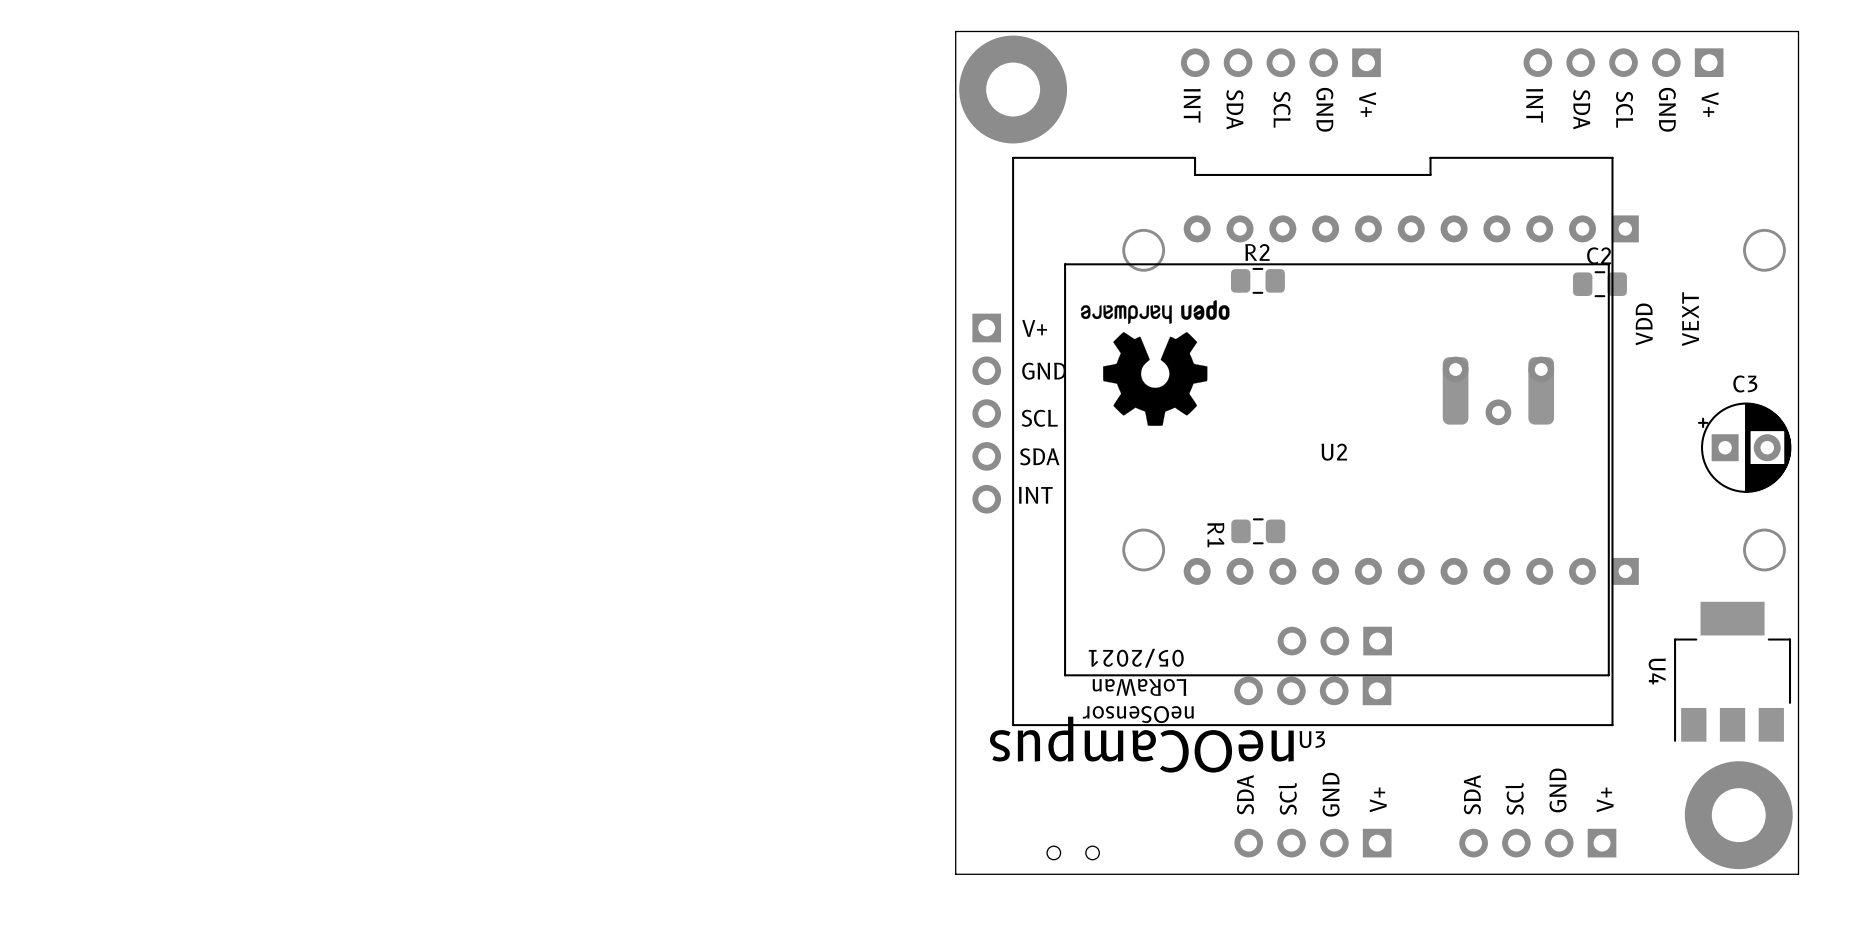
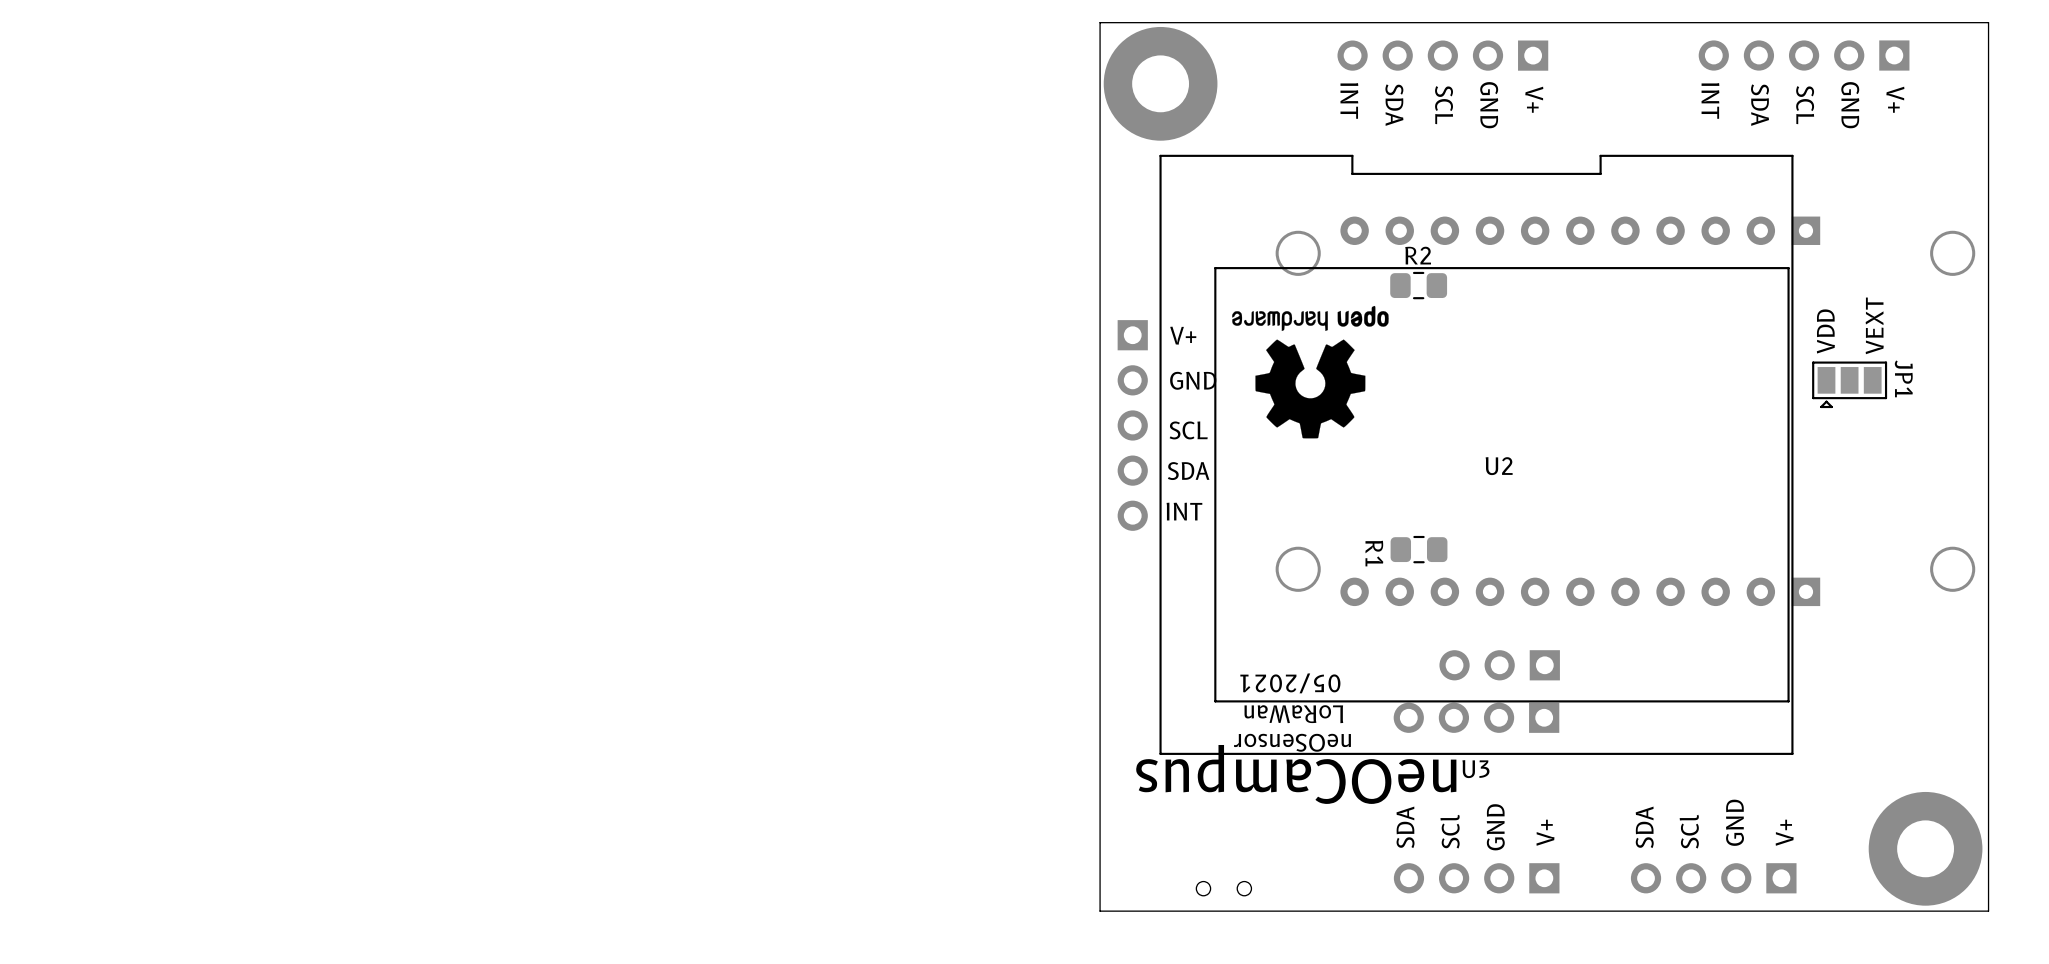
C2: (1599, 284) -> none
JP1: none -> (1849, 384)
part: (1498, 390) -> none
C3: (1744, 447) -> none
U4: (1732, 671) -> none

